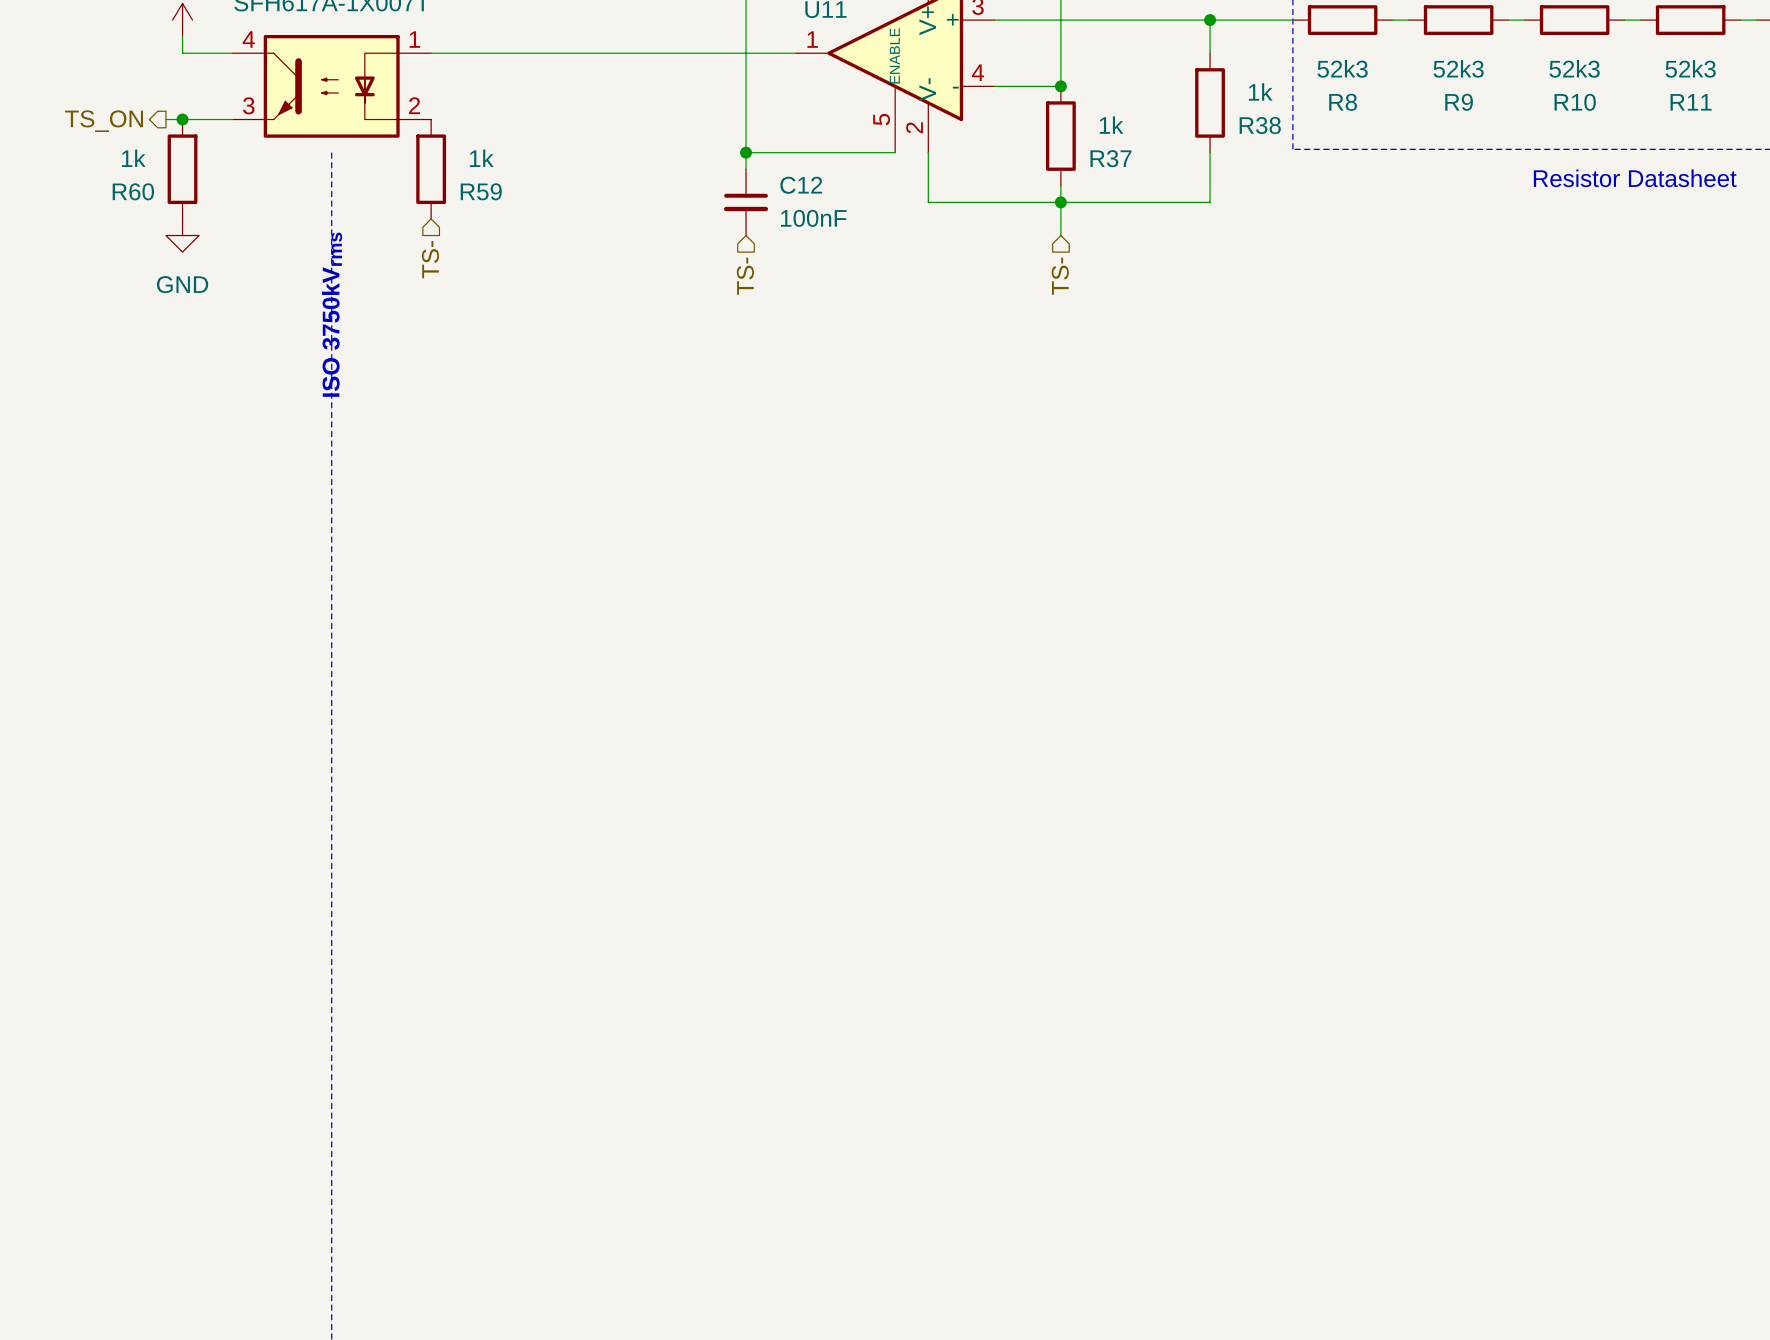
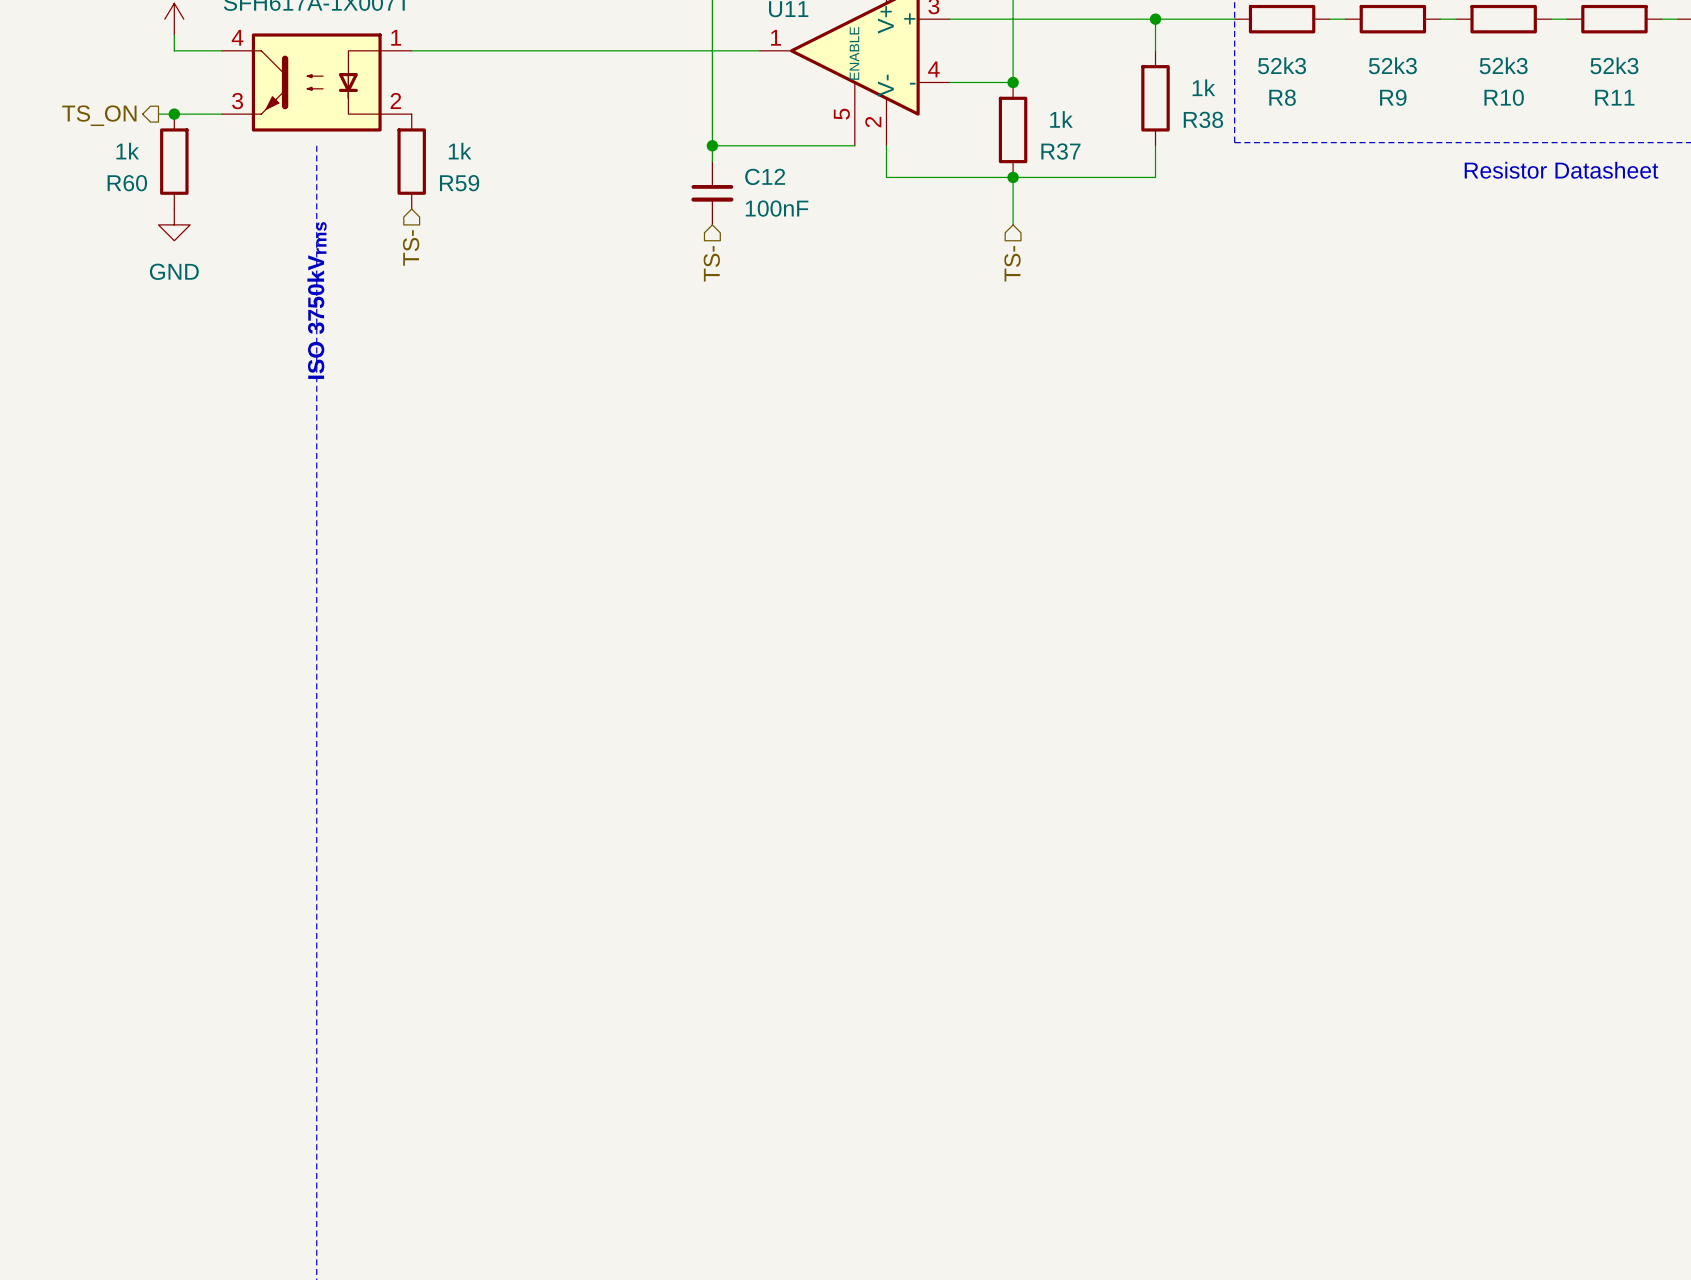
wire: (928, 185) (928, 202) (1210, 202) (1210, 185) -> (886, 177) (1155, 177)
junction position: (1060, 202) -> (1013, 177)

